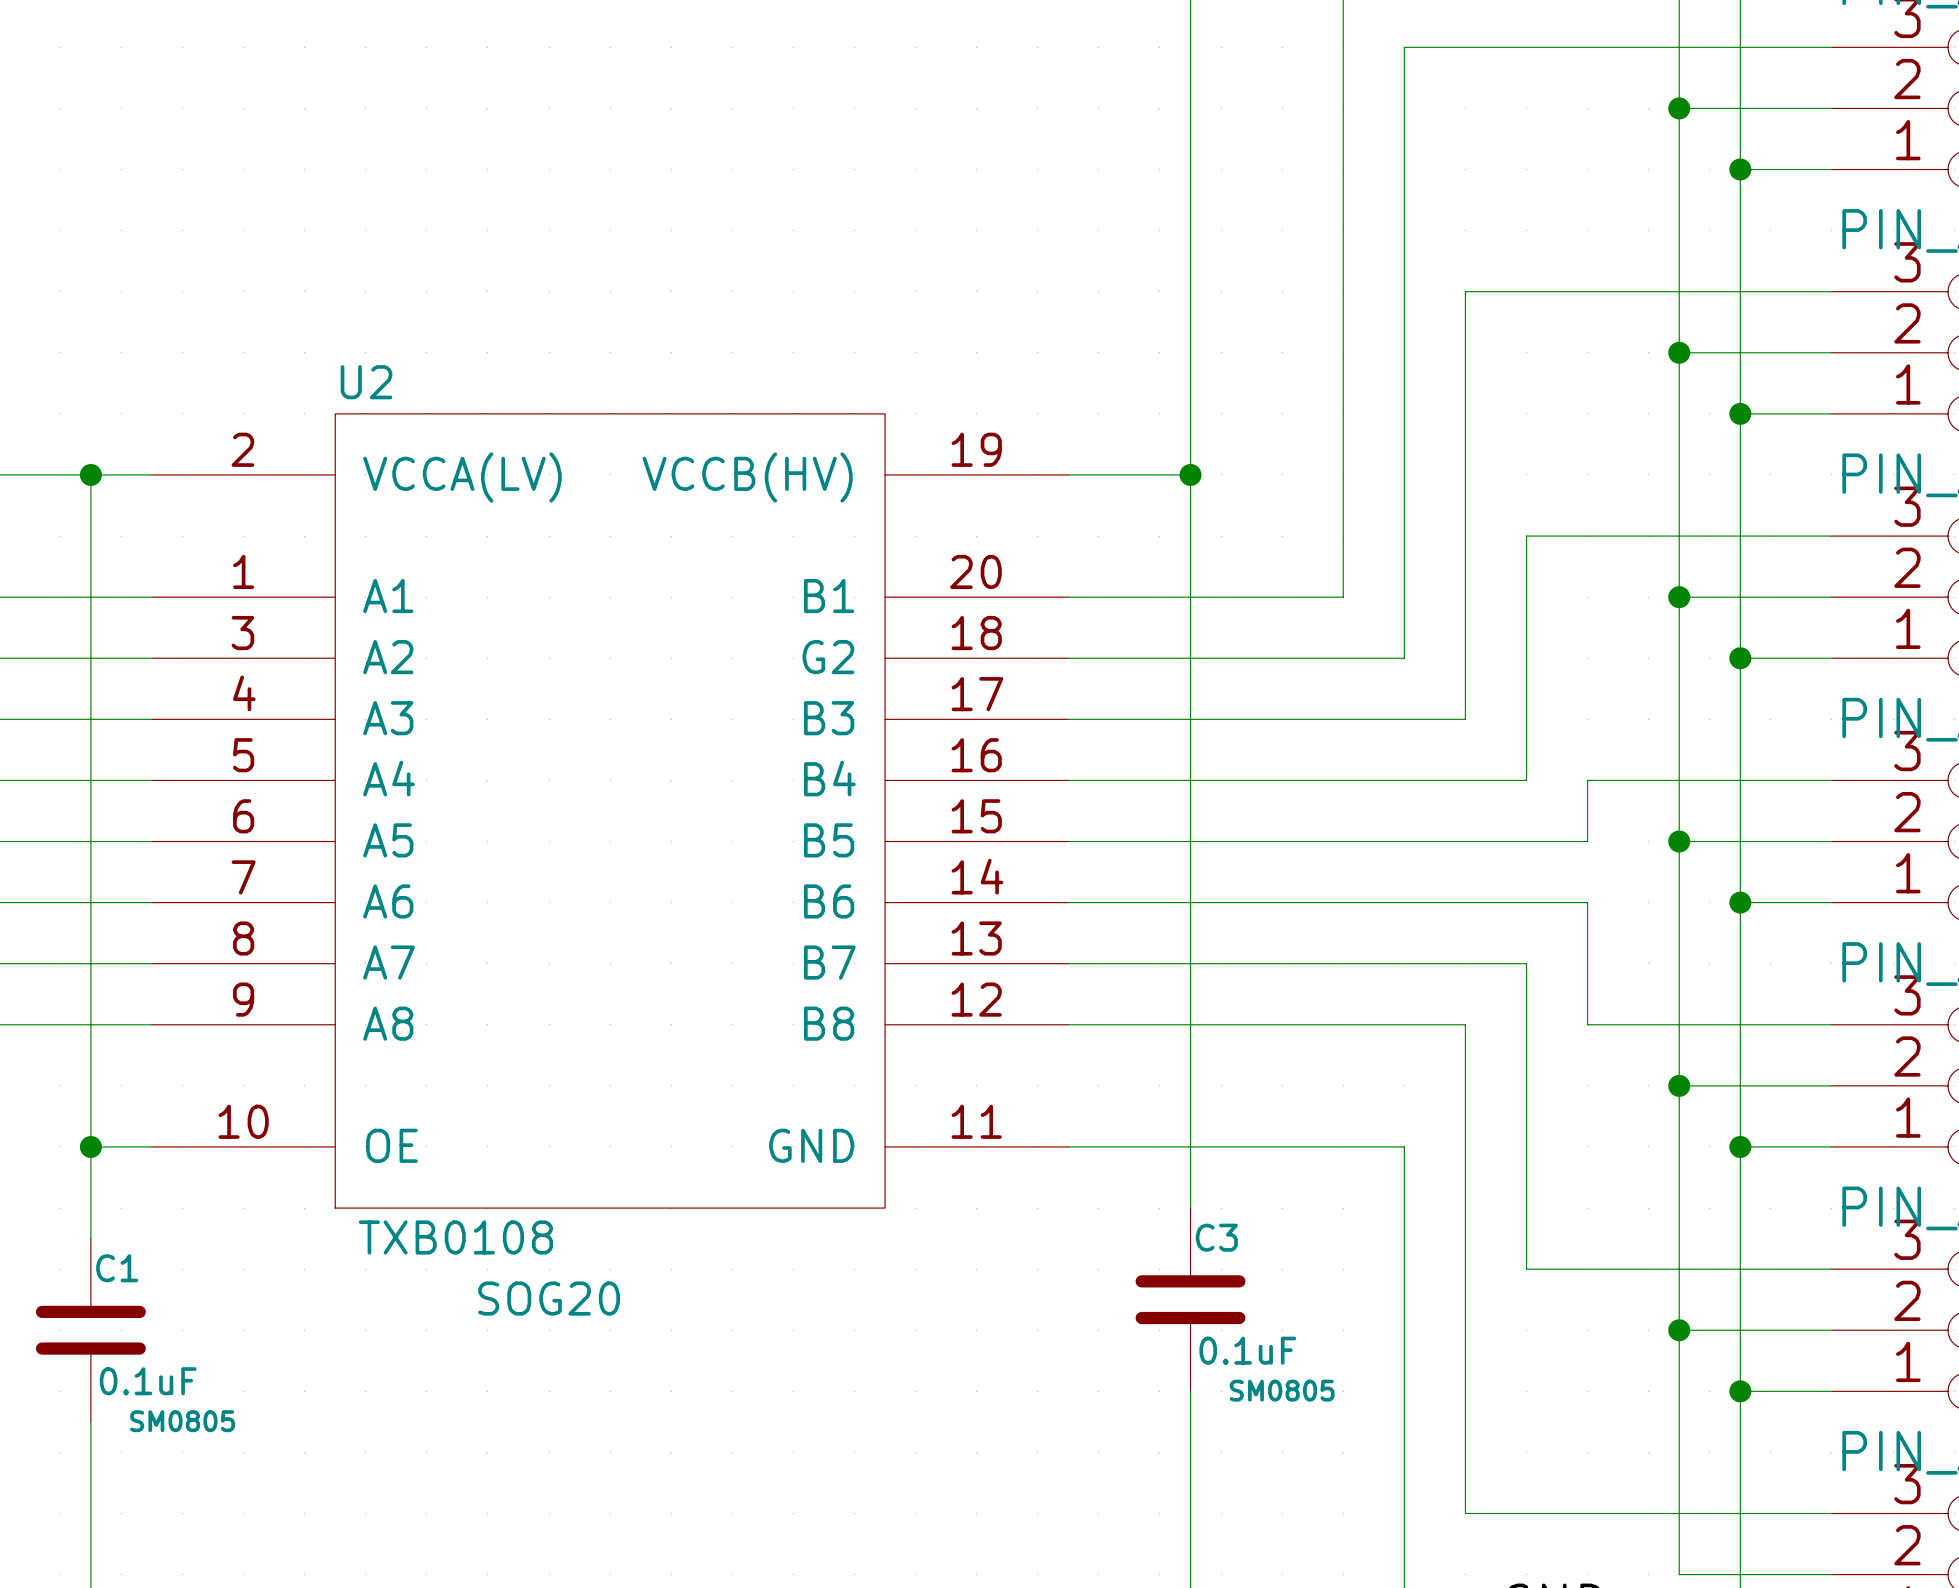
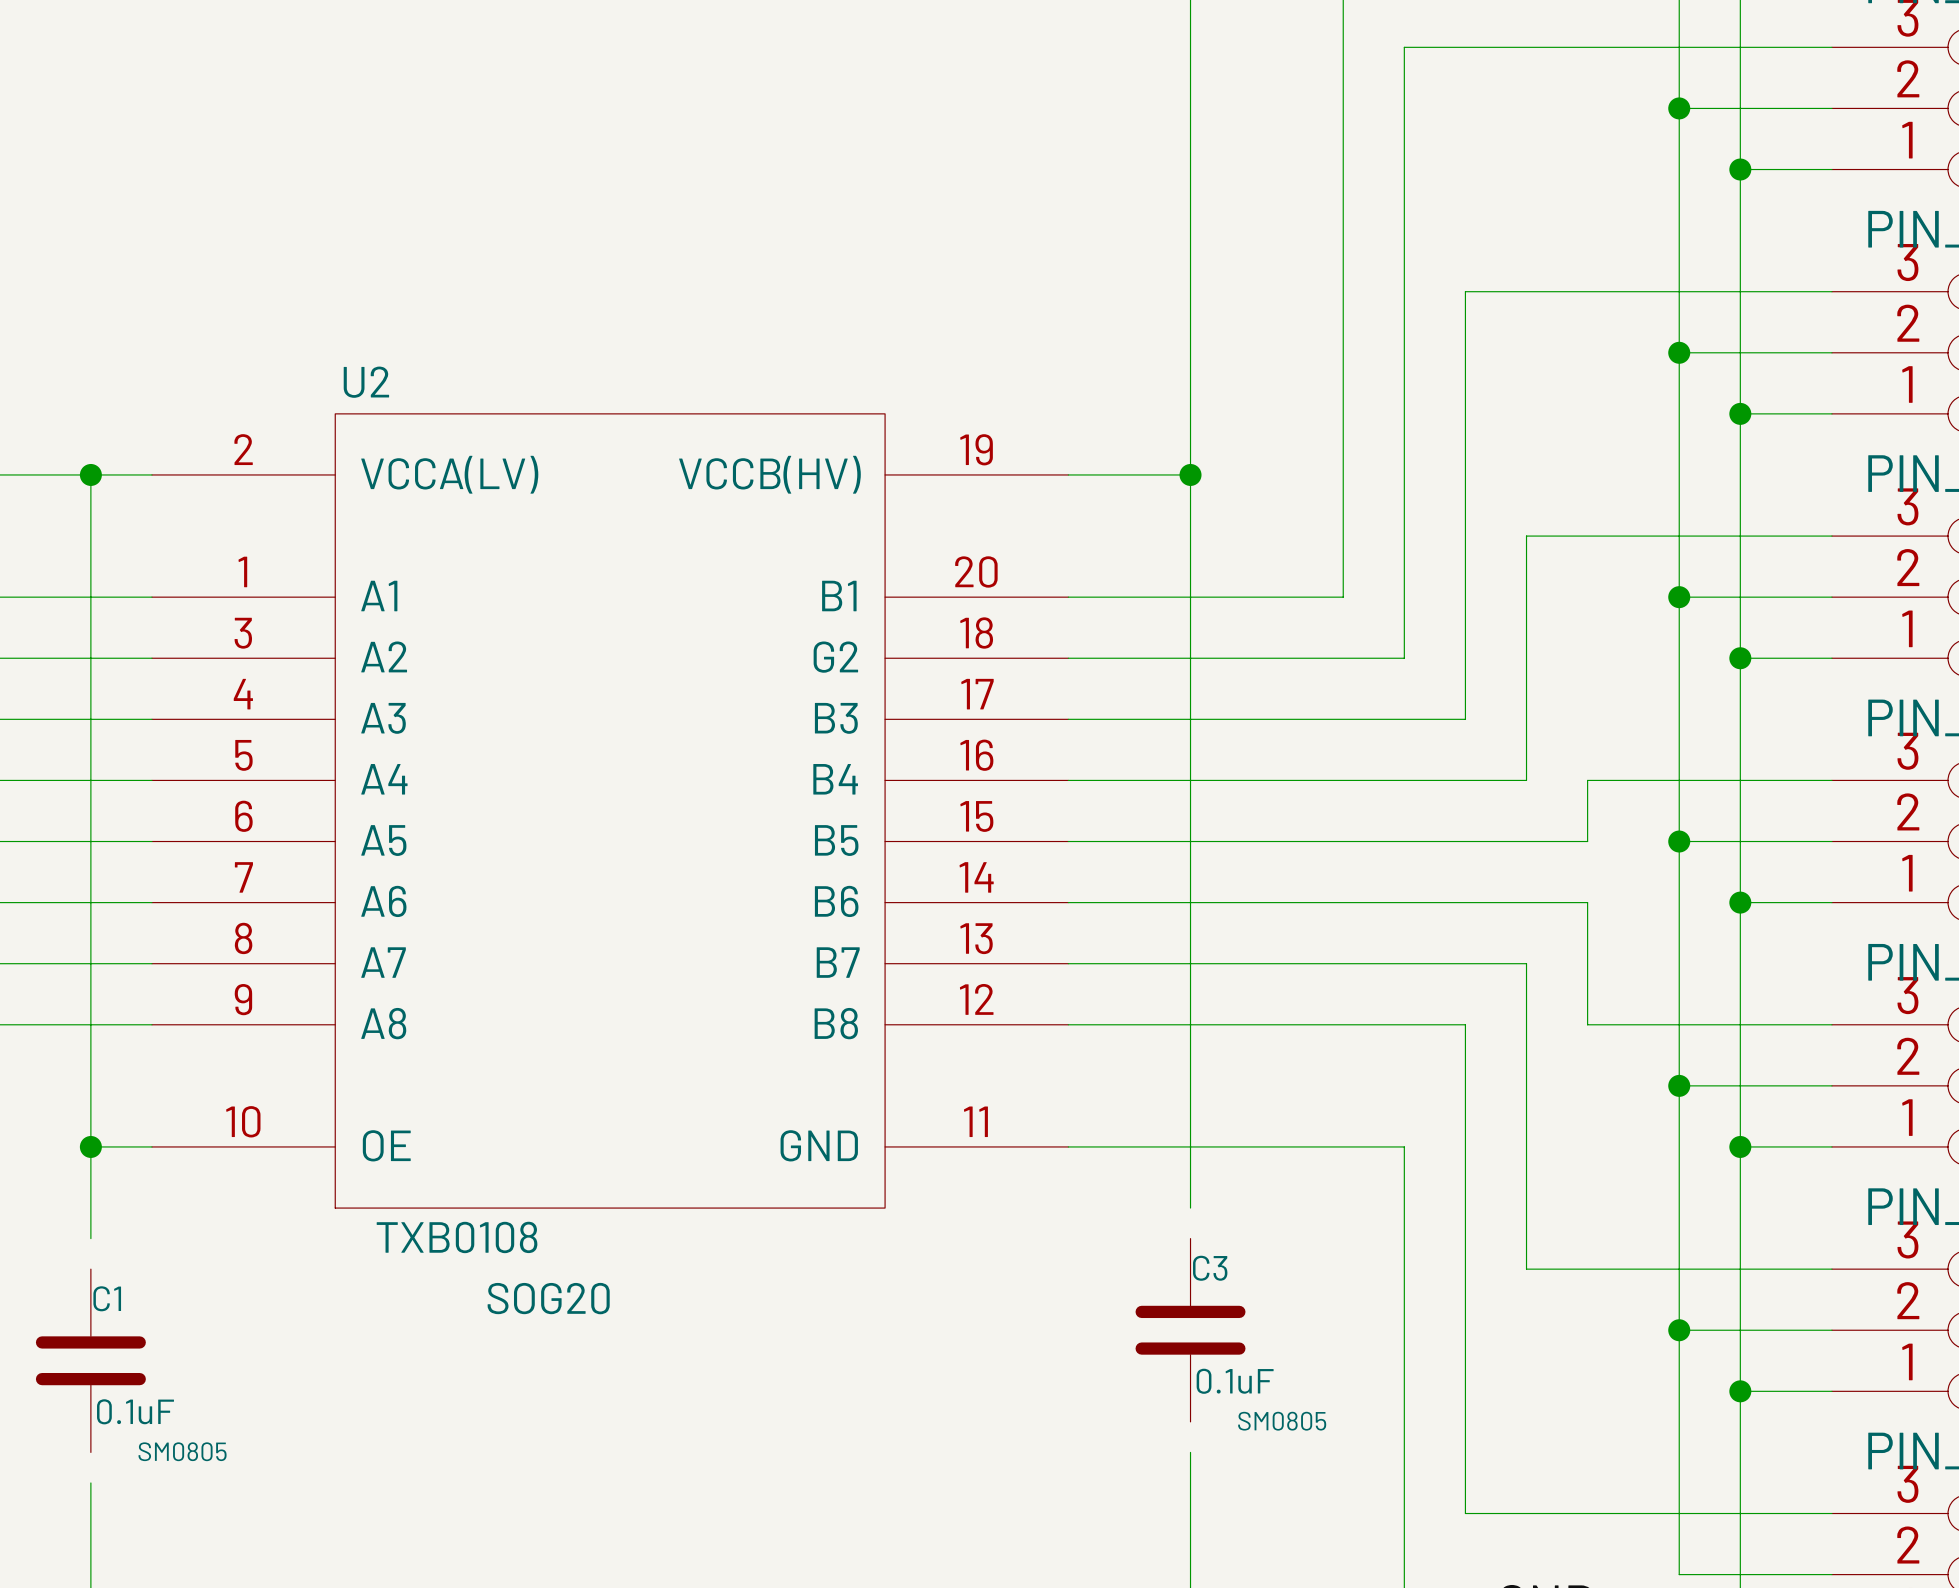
C3 position: (1190, 1299) -> (1190, 1330)
C1 position: (90, 1330) -> (90, 1360)
wire: (1190, 1391) (1190, 1452) -> none
wire: (90, 1421) (90, 1482) -> none

